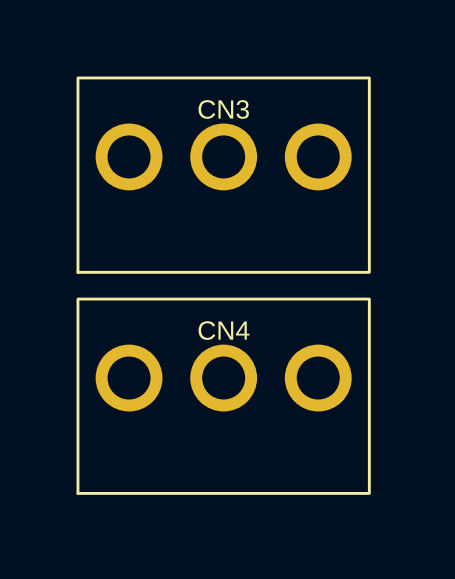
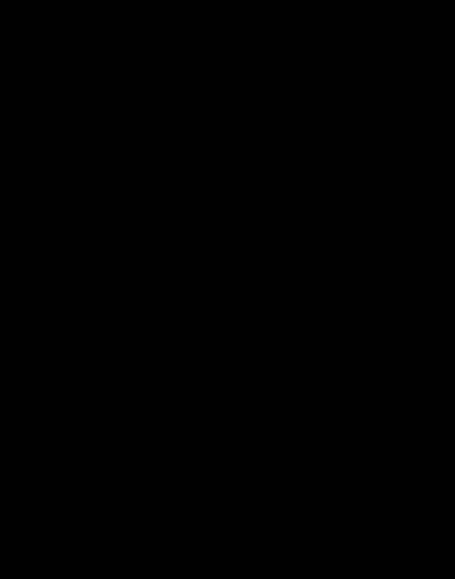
CN3: (223, 175) -> none
CN4: (223, 396) -> none

